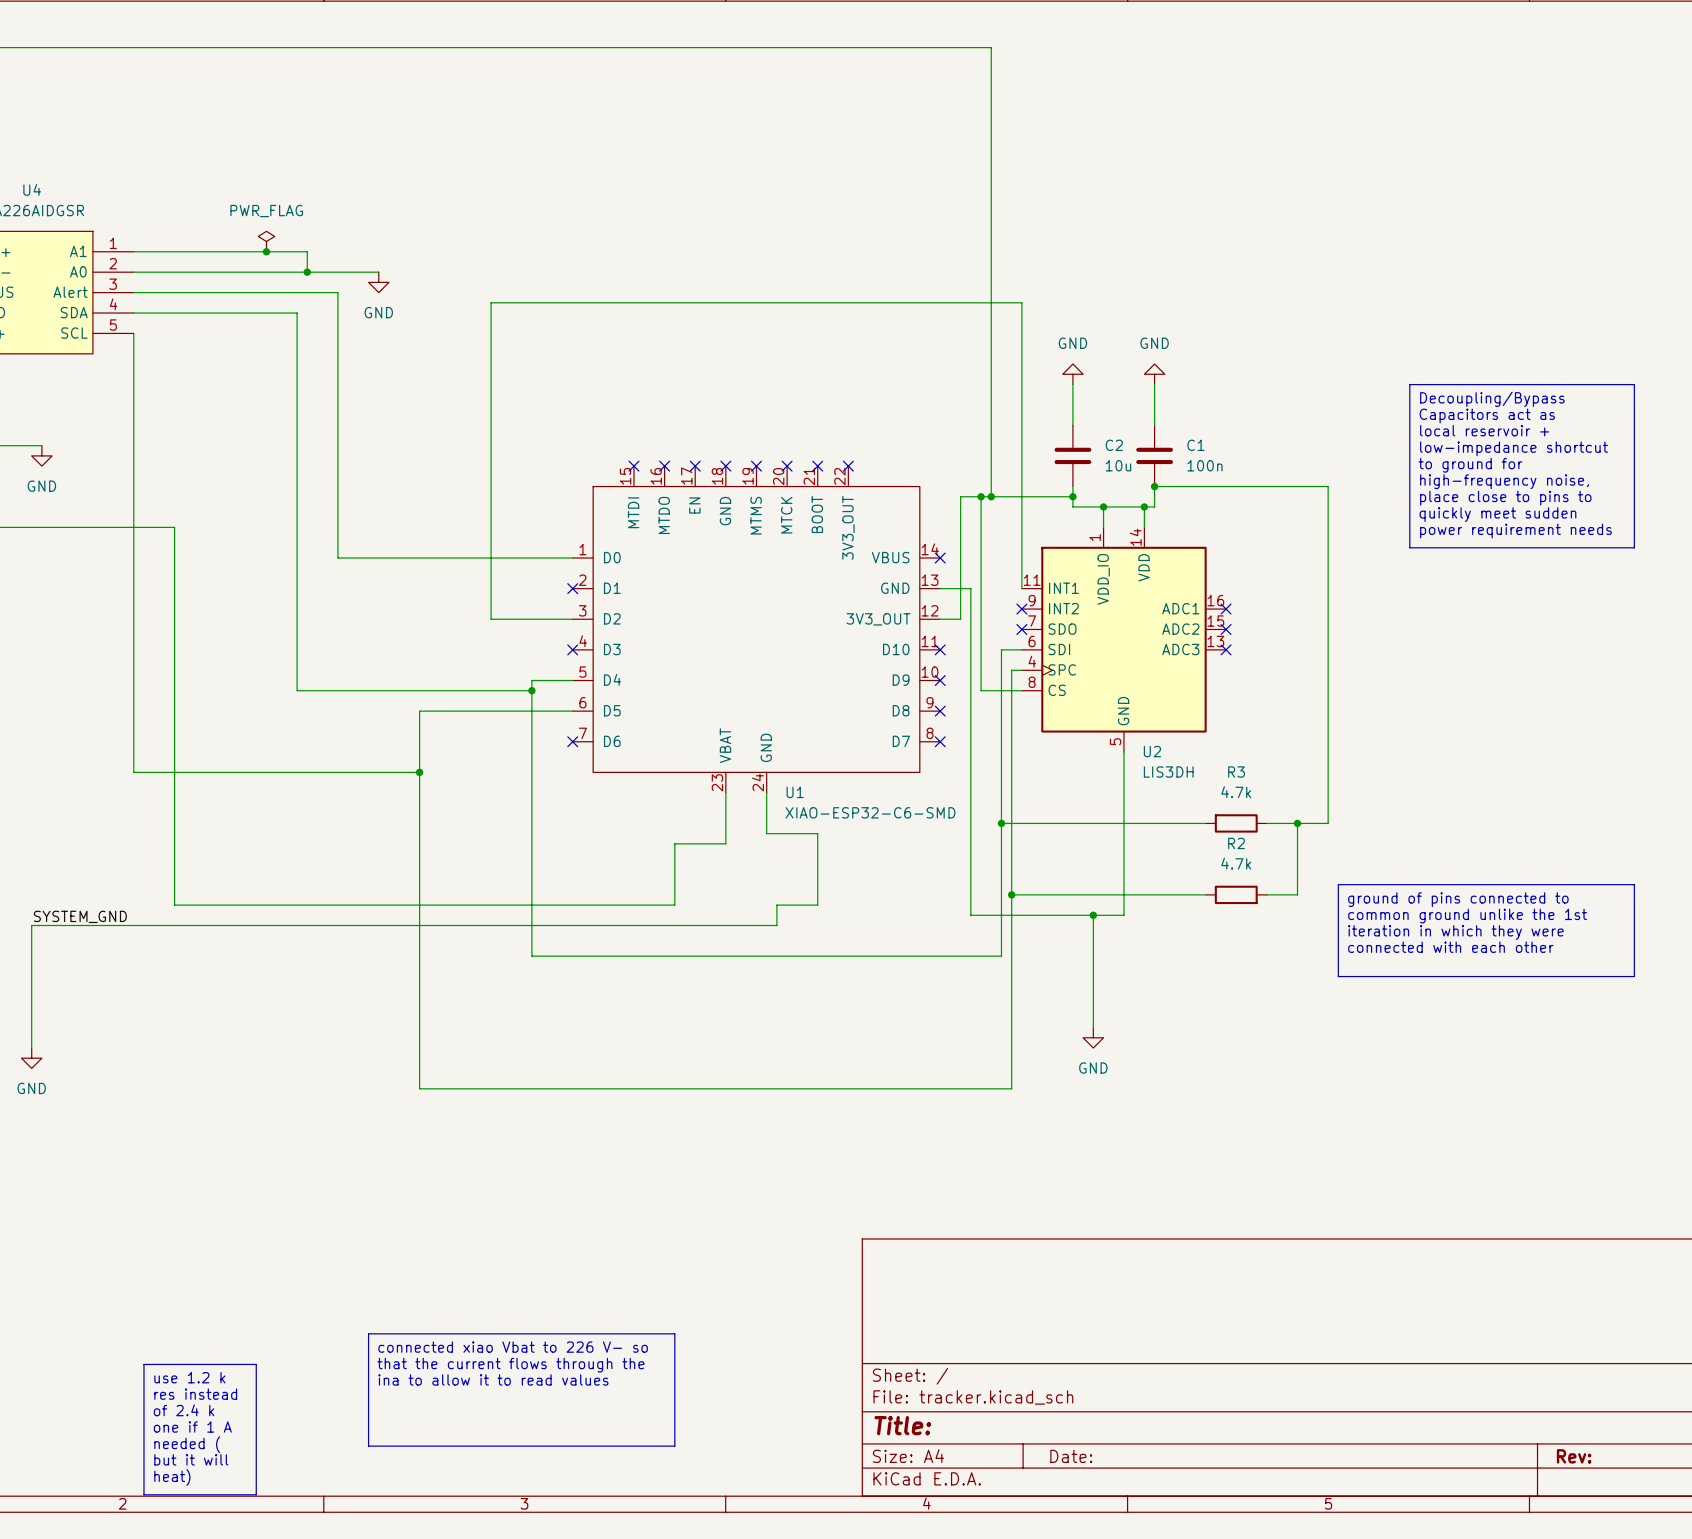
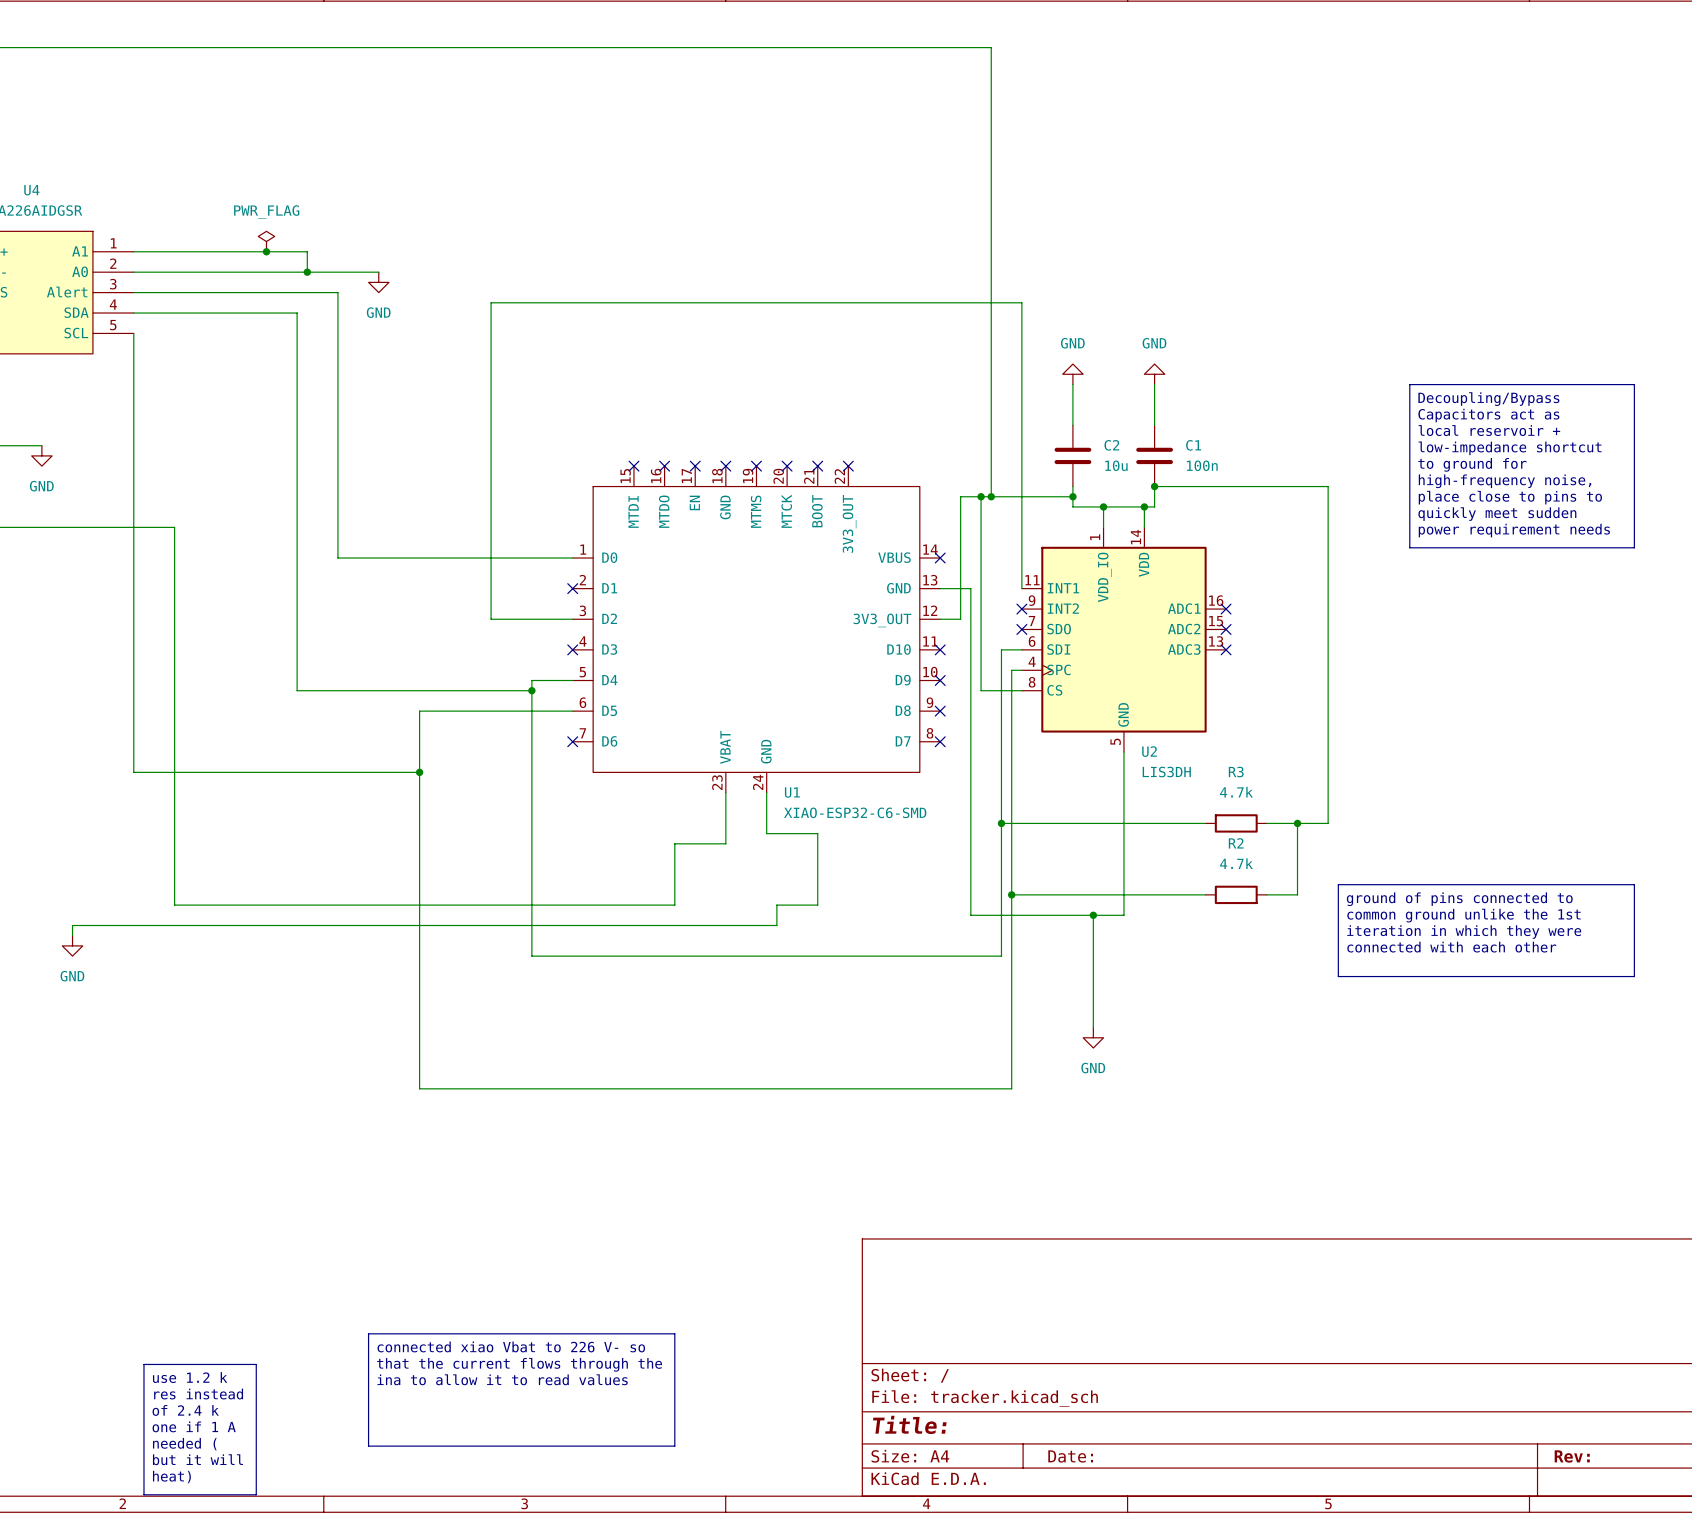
label: SYSTEM_GND (80, 916) -> none
wire: (72, 925) (31, 925) (31, 1048) -> (72, 925) (72, 935)
power symbol position: GND (31, 1058) -> GND (72, 945)

